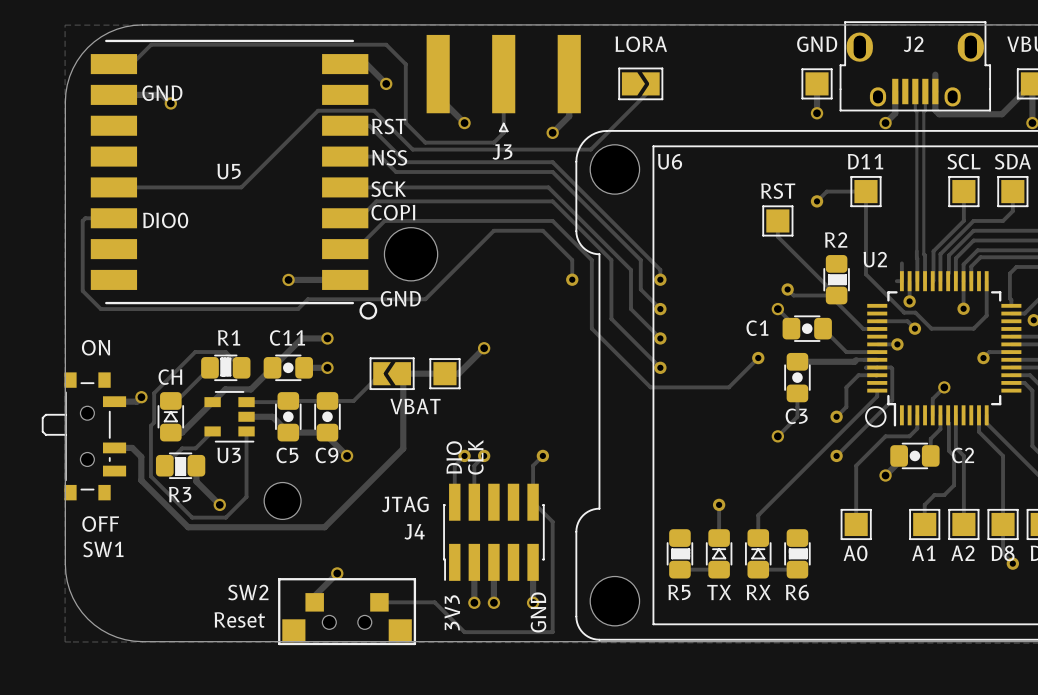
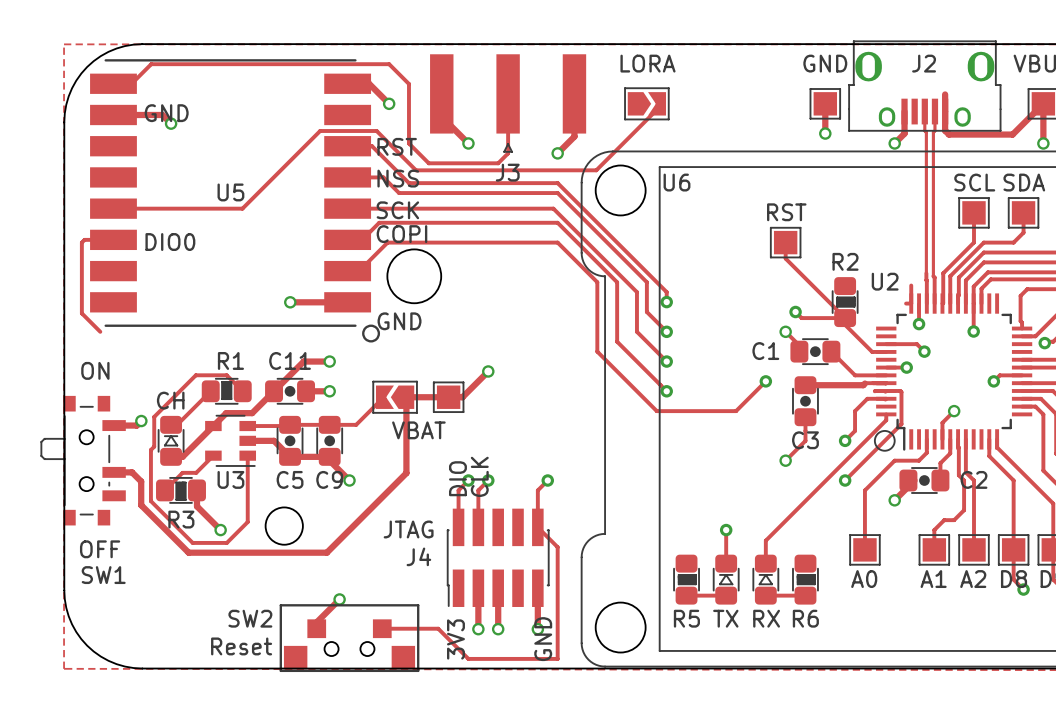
text: D11 (865, 161) -> none
track: (865, 191) (826, 191) (817, 201) -> none
part: (865, 191) -> none
via: (817, 201) -> none
track: (865, 201) (865, 274) (904, 312) (915, 312) (931, 328) (973, 328) (986, 315) (986, 281) -> none
track: (572, 279) (572, 260) (542, 230) (493, 230) (425, 299) (307, 299) (298, 309) (100, 309) -> none
via: (572, 279) -> none

